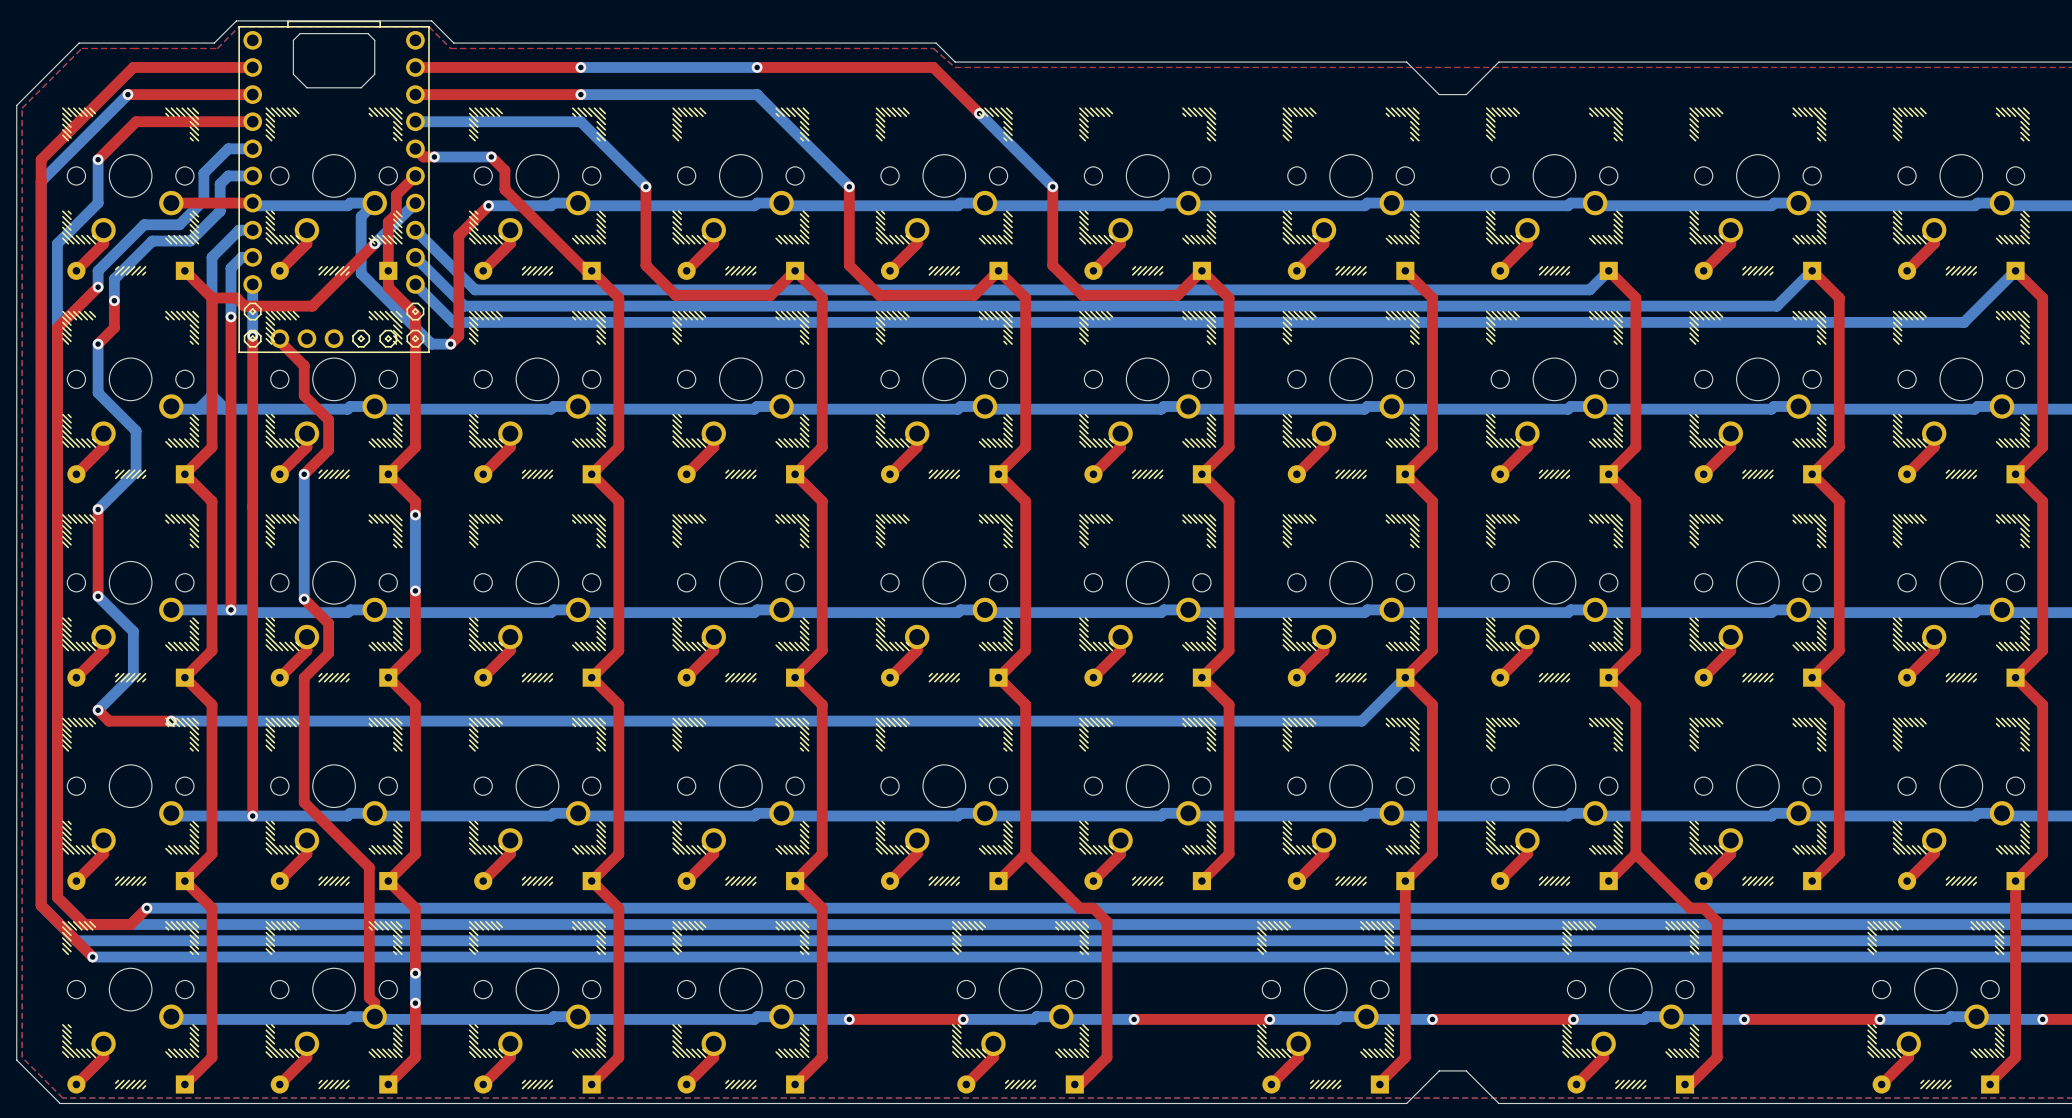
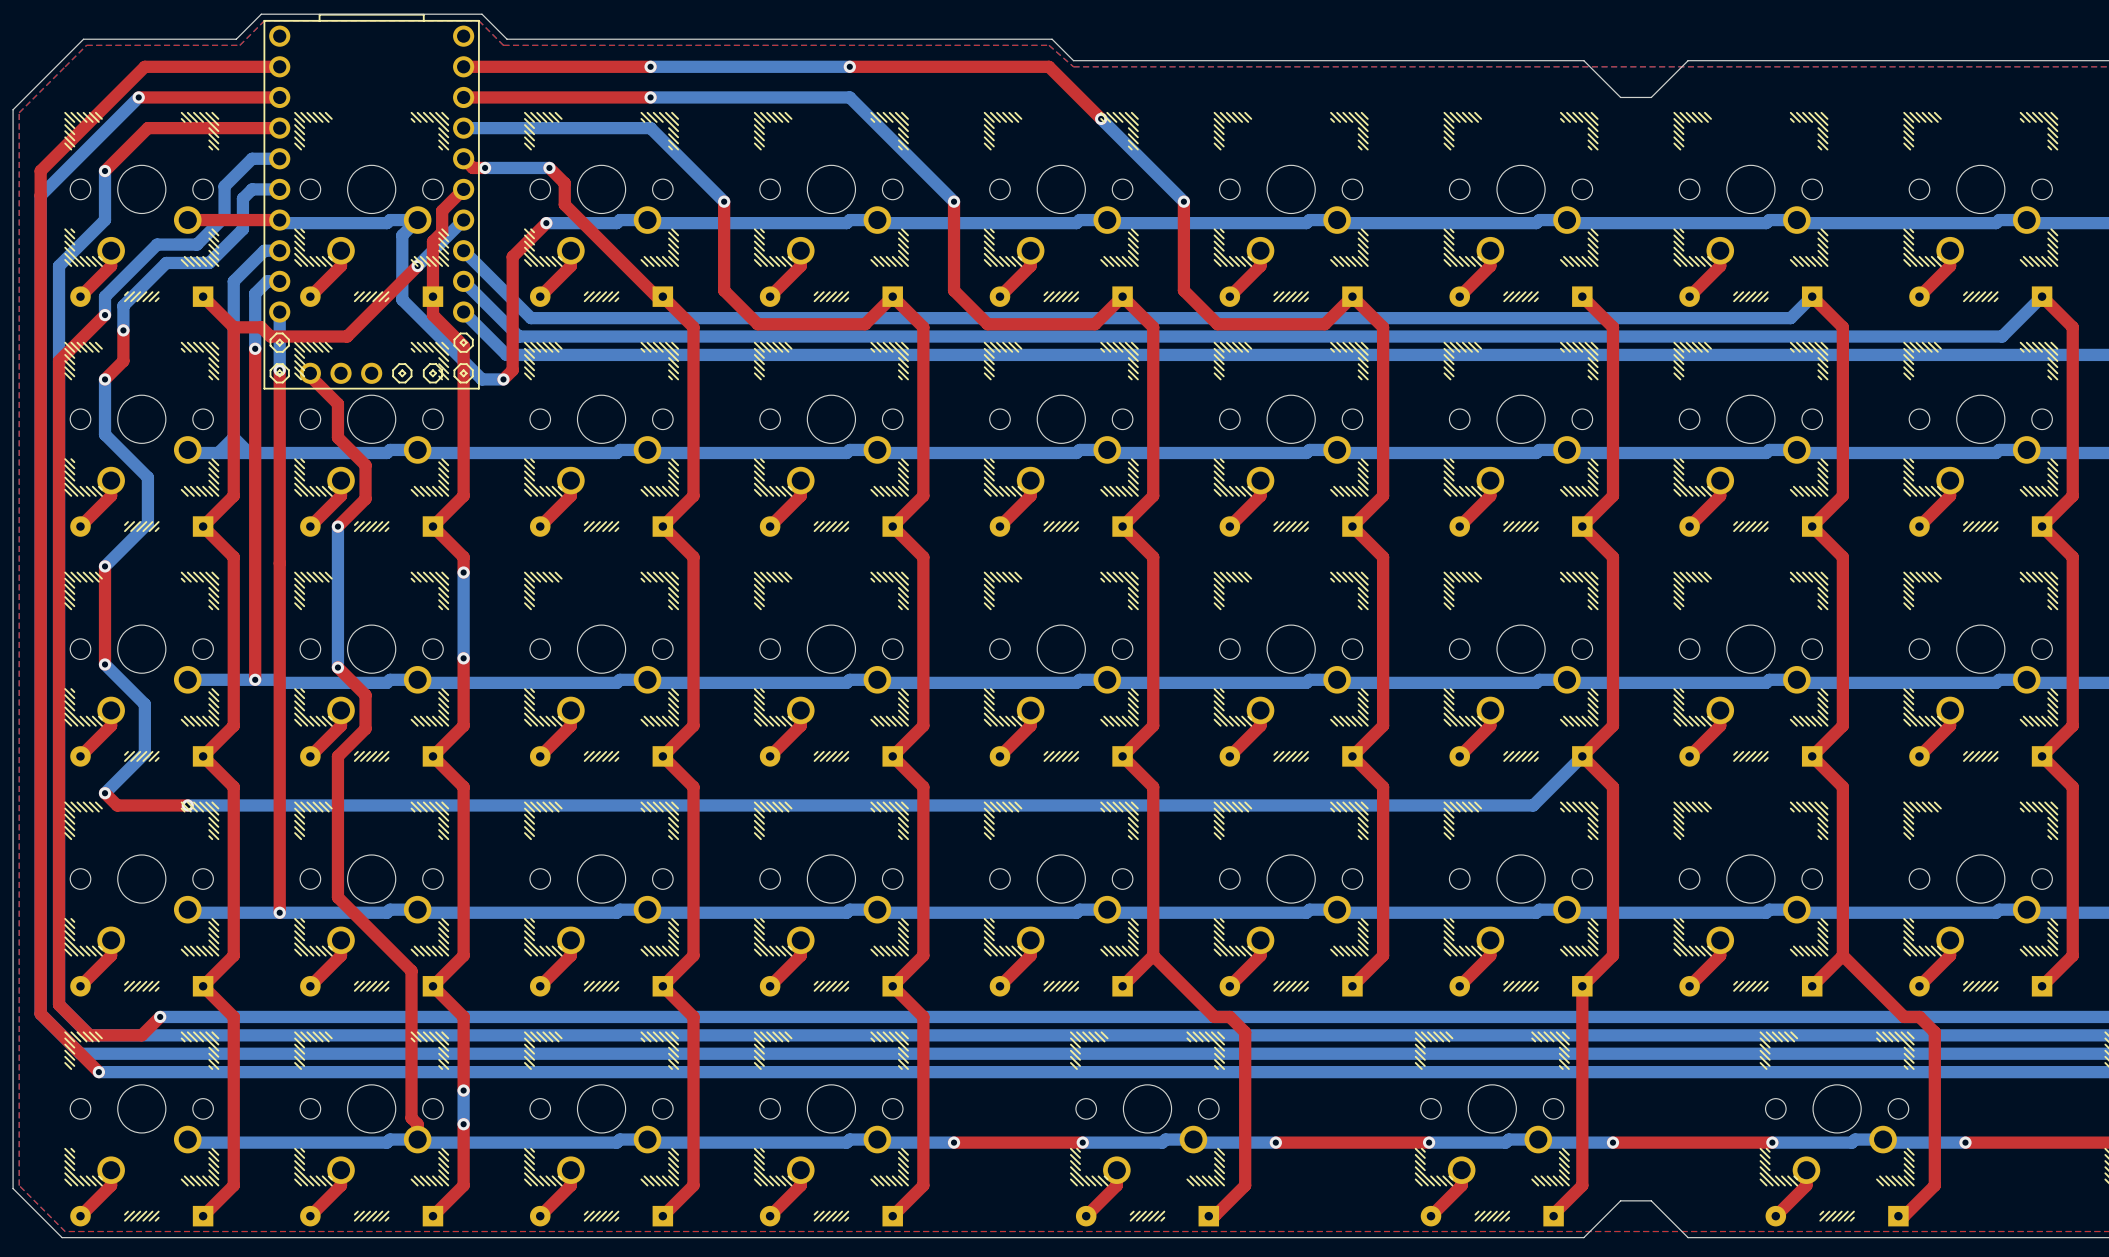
board edge: (300, 33) (293, 40) (293, 74) (306, 87) (361, 87) (374, 74) (374, 40) (367, 33) (300, 33) -> none

